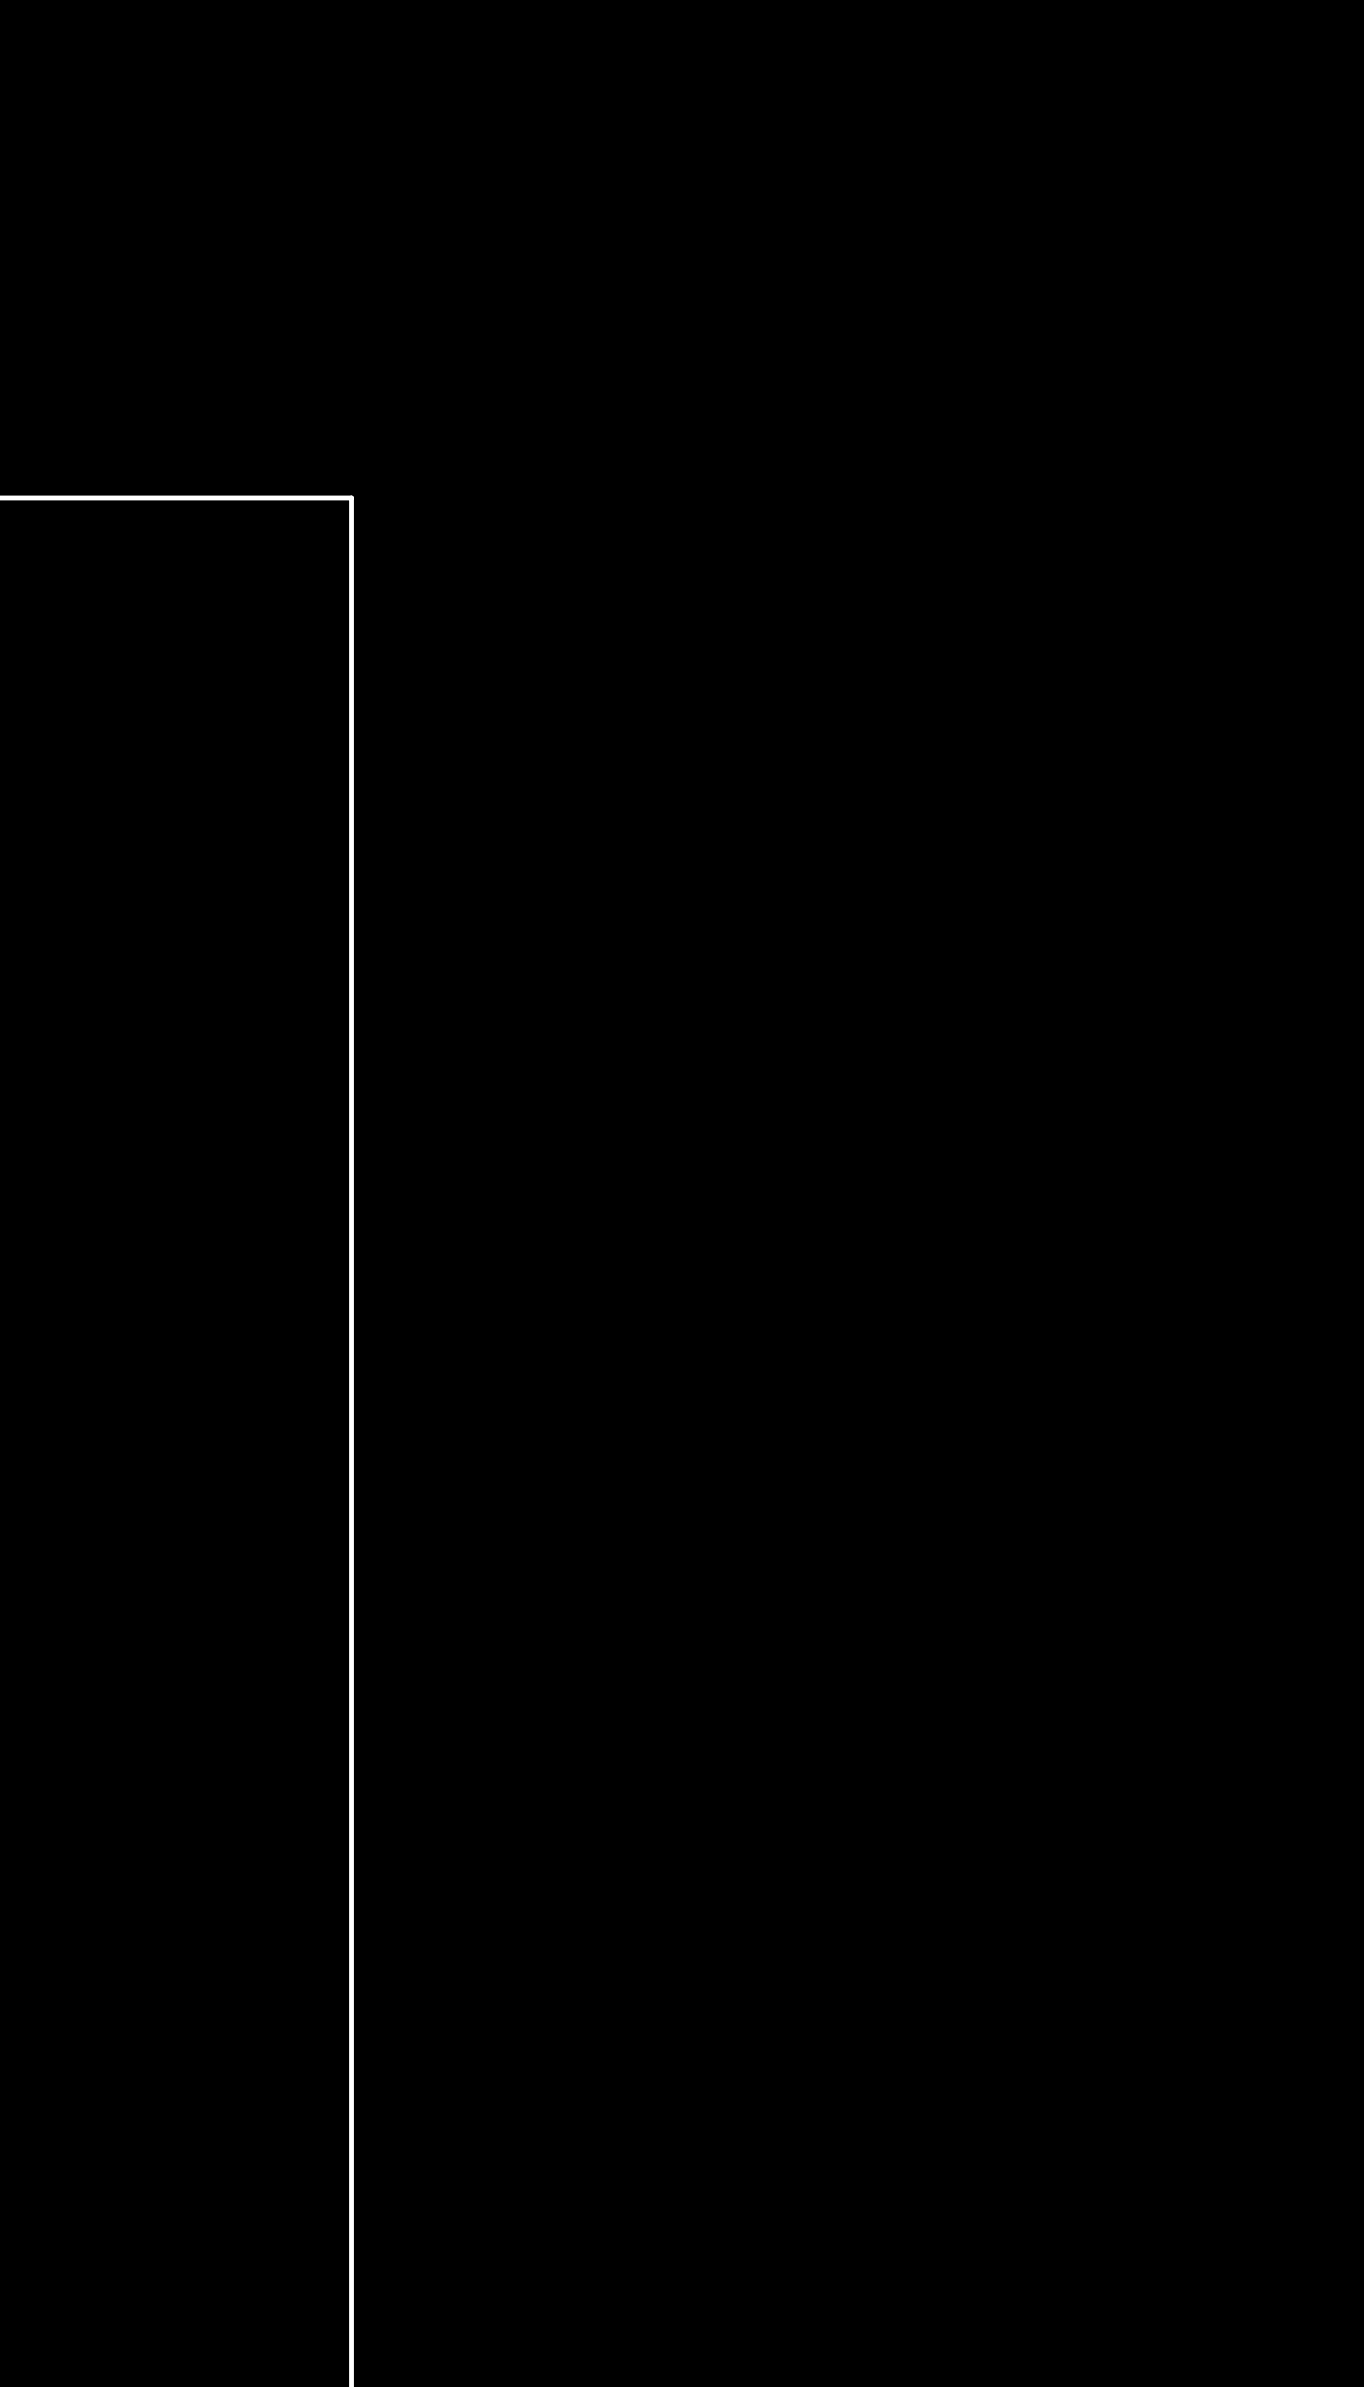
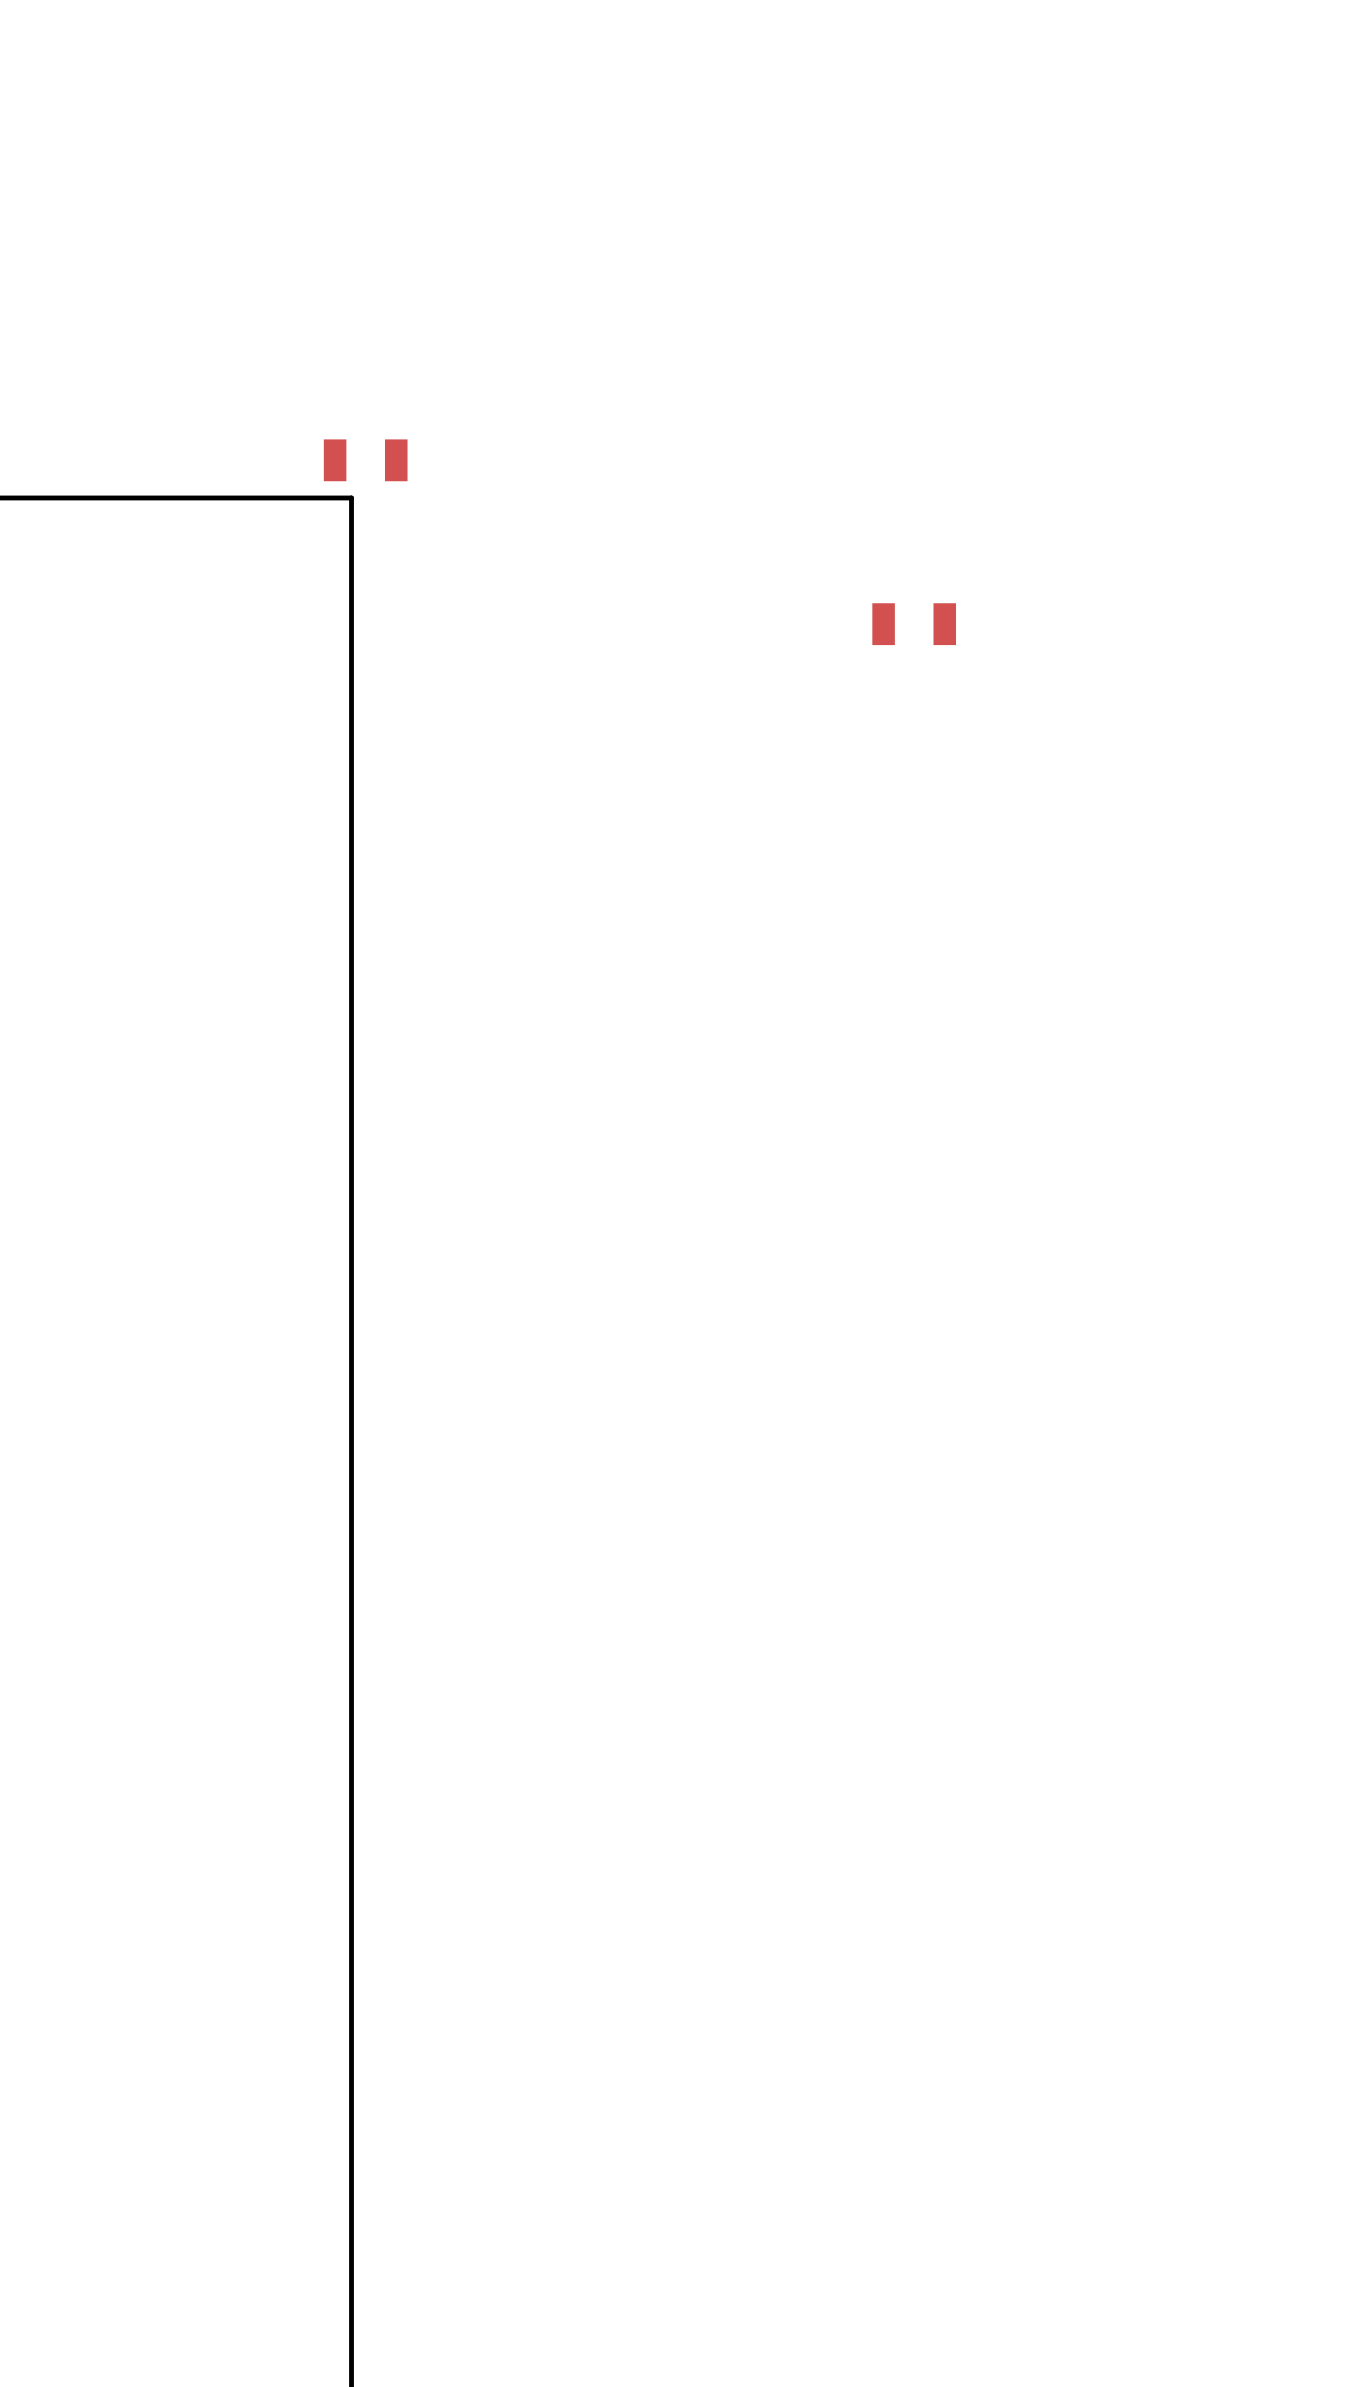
part: none -> (365, 460)
part: none -> (914, 624)

